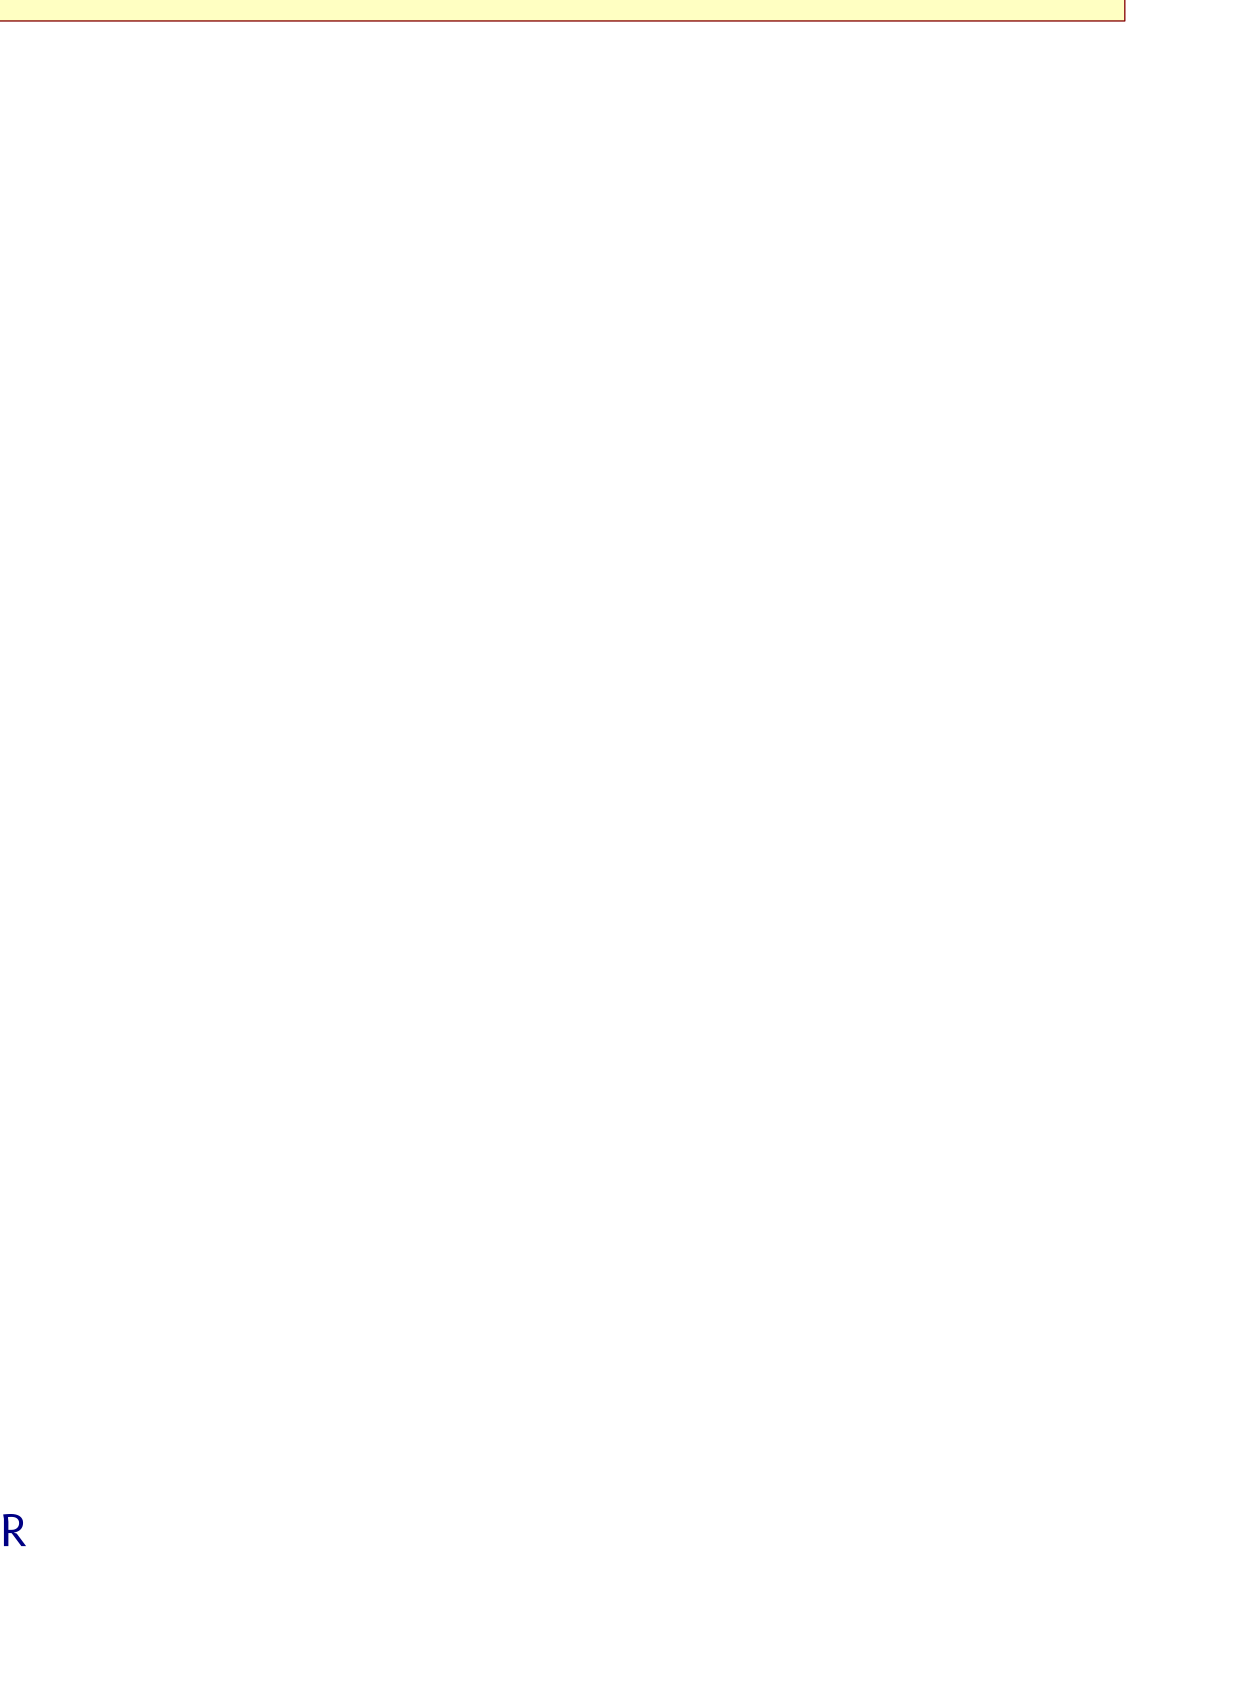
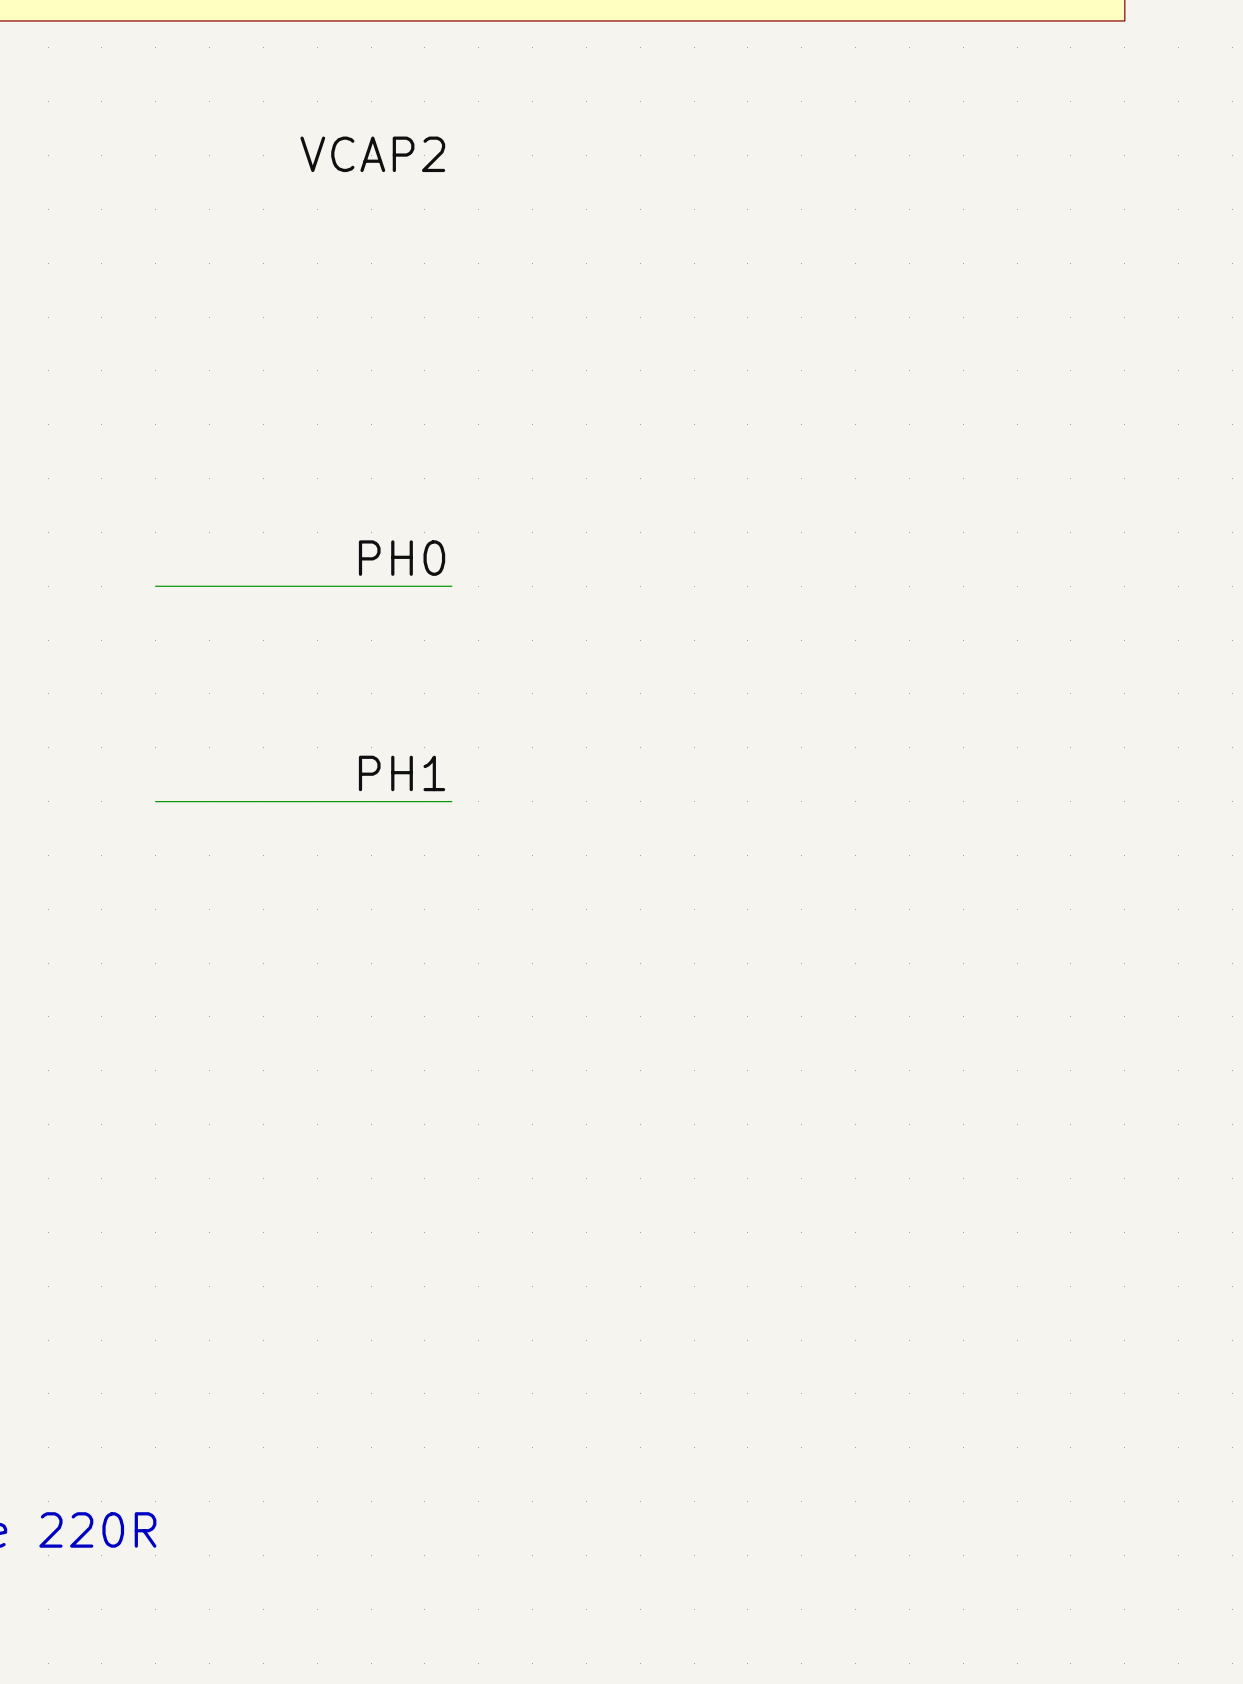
label: none -> VCAP2 (372, 154)
label: none -> PH0 (402, 558)
wire: none -> (155, 586) (451, 586)
label: none -> PH1 (402, 773)
wire: none -> (155, 801) (451, 801)

